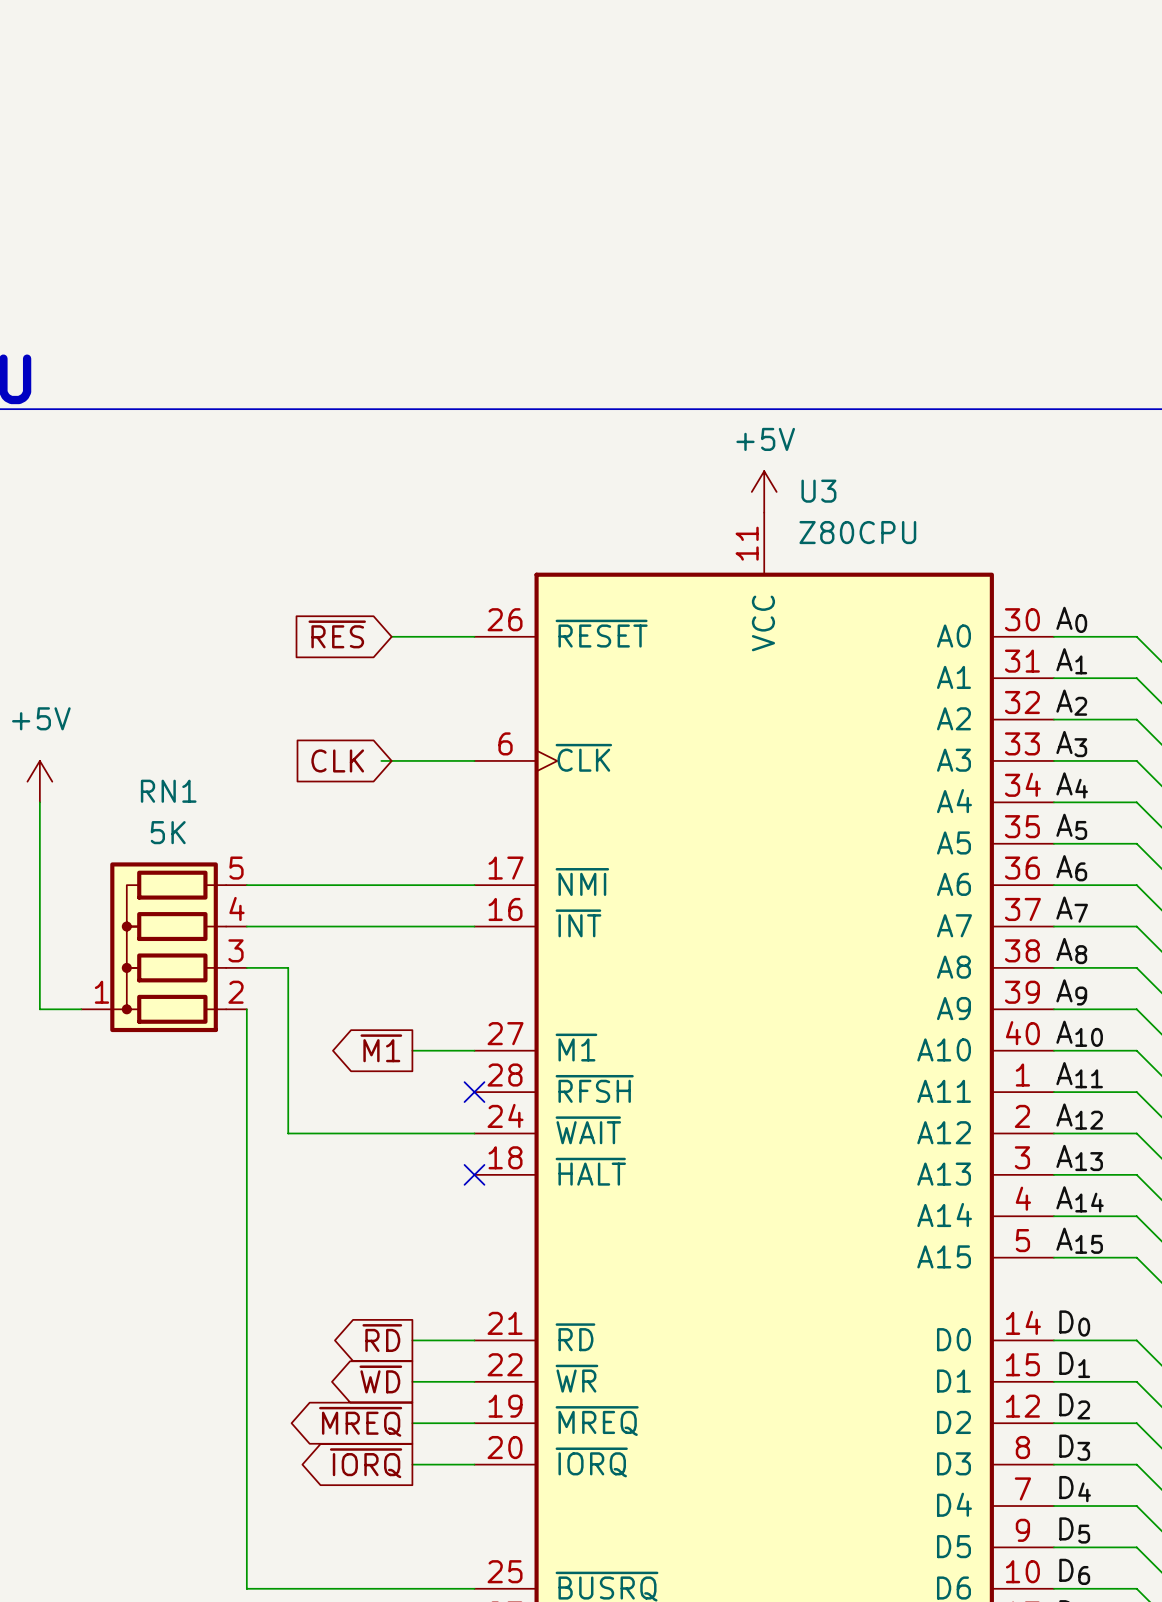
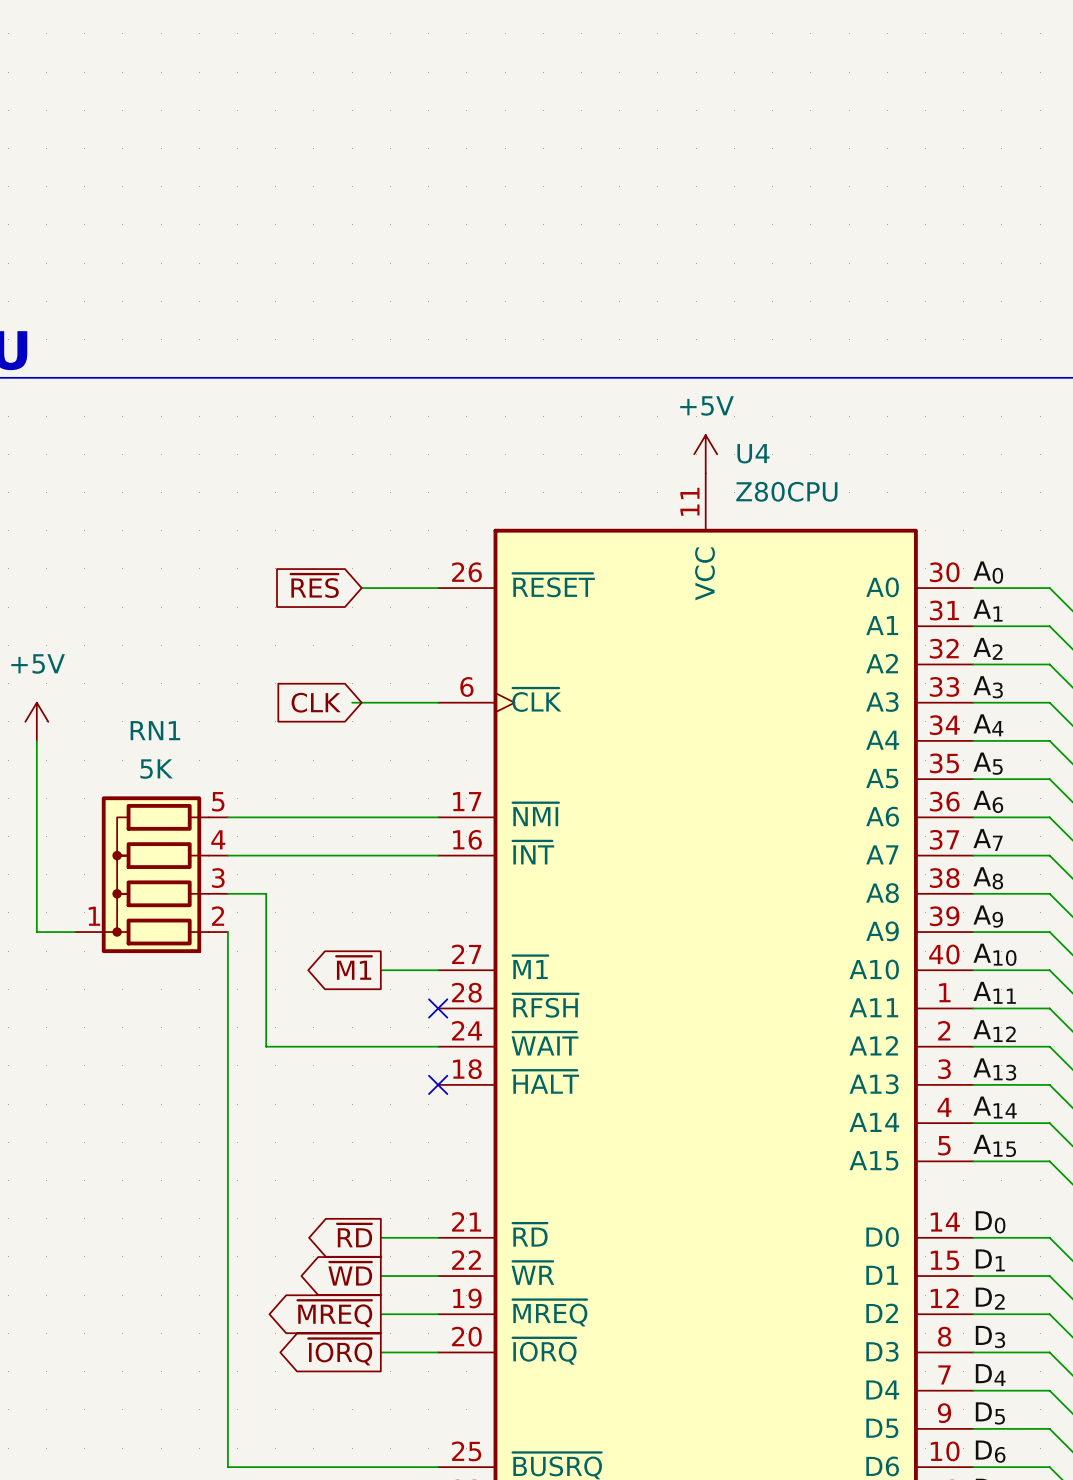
U3 name: U3 (818, 491) -> U4 (753, 453)

